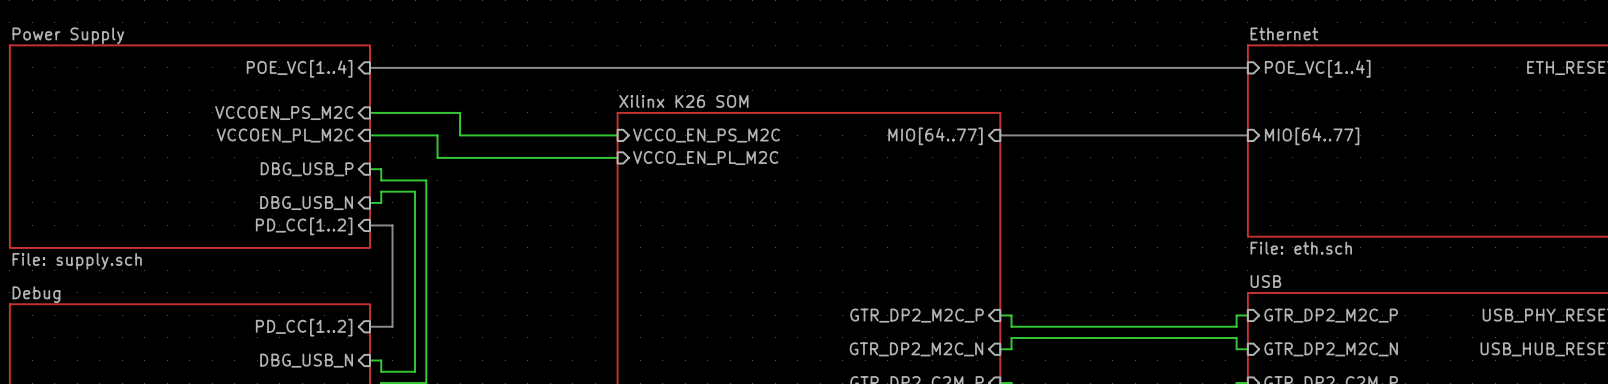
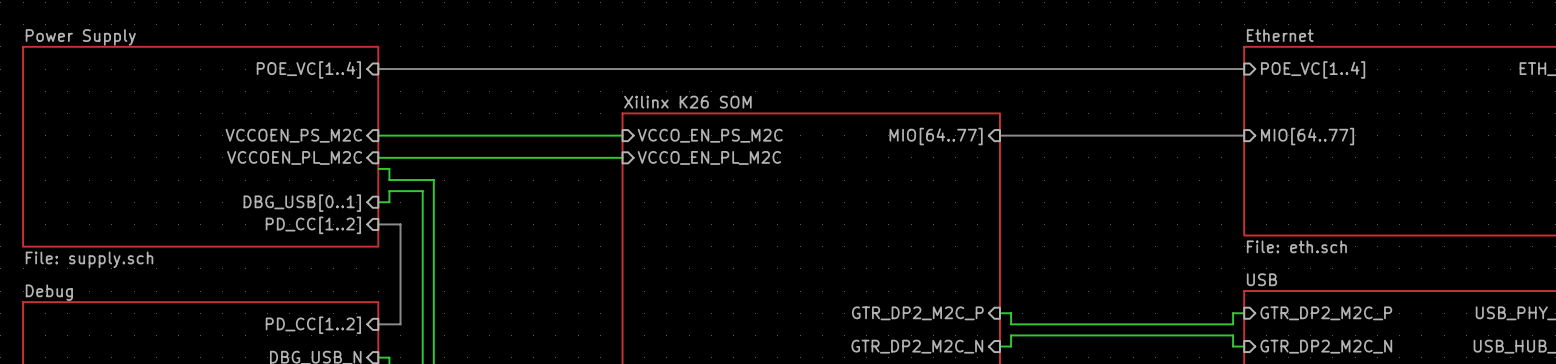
wire: (370, 112) (460, 112) (460, 135) -> none
sheet pin: VCCOEN_PS_M2C (284, 113) -> none
sheet pin: VCCOEN_PL_M2C (285, 135) -> VCCOEN_PS_M2C (293, 135)
wire: (437, 135) (437, 157) -> (444, 135) (467, 135)
wire: none -> (378, 157) (444, 157)
sheet pin: none -> VCCOEN_PL_M2C (294, 157)
sheet pin: DBG_USB_P (307, 169) -> none
sheet pin: DBG_USB_N (306, 203) -> DBG_USB[0..1] (302, 203)

